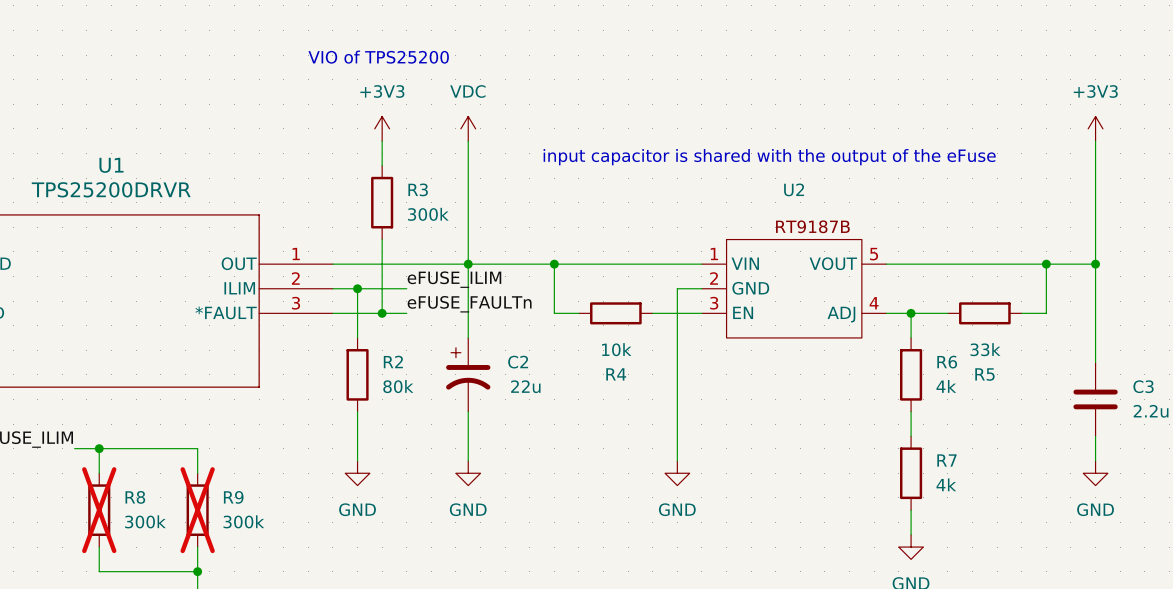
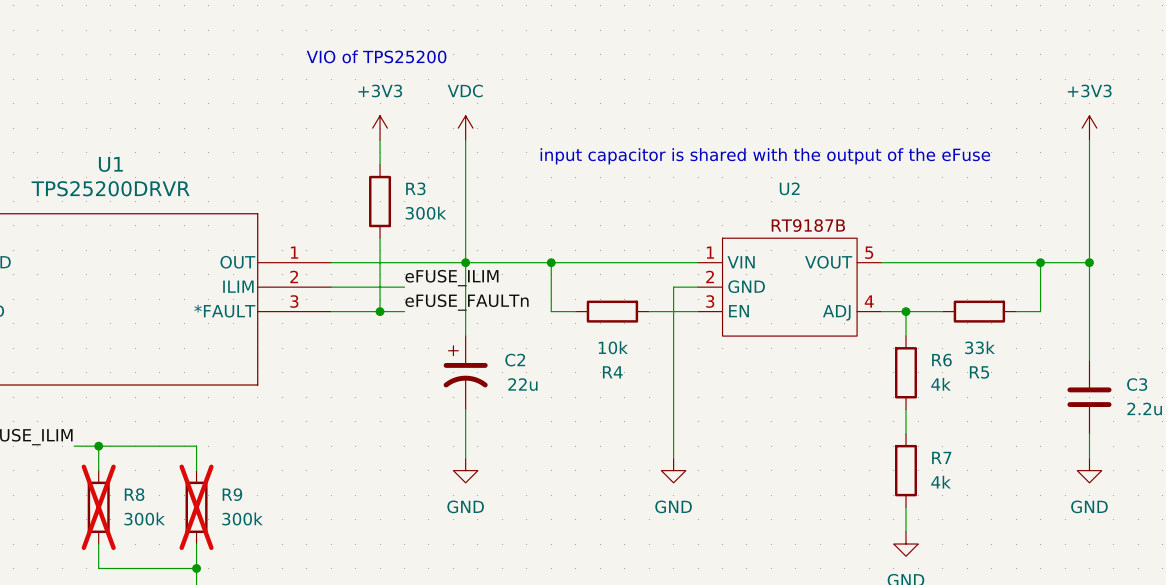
wire: (357, 288) (357, 337) -> none
junction: (357, 288) -> none
R2: 80k (357, 374) -> none
wire: (357, 411) (357, 460) -> none
power symbol: GND (357, 473) -> none

